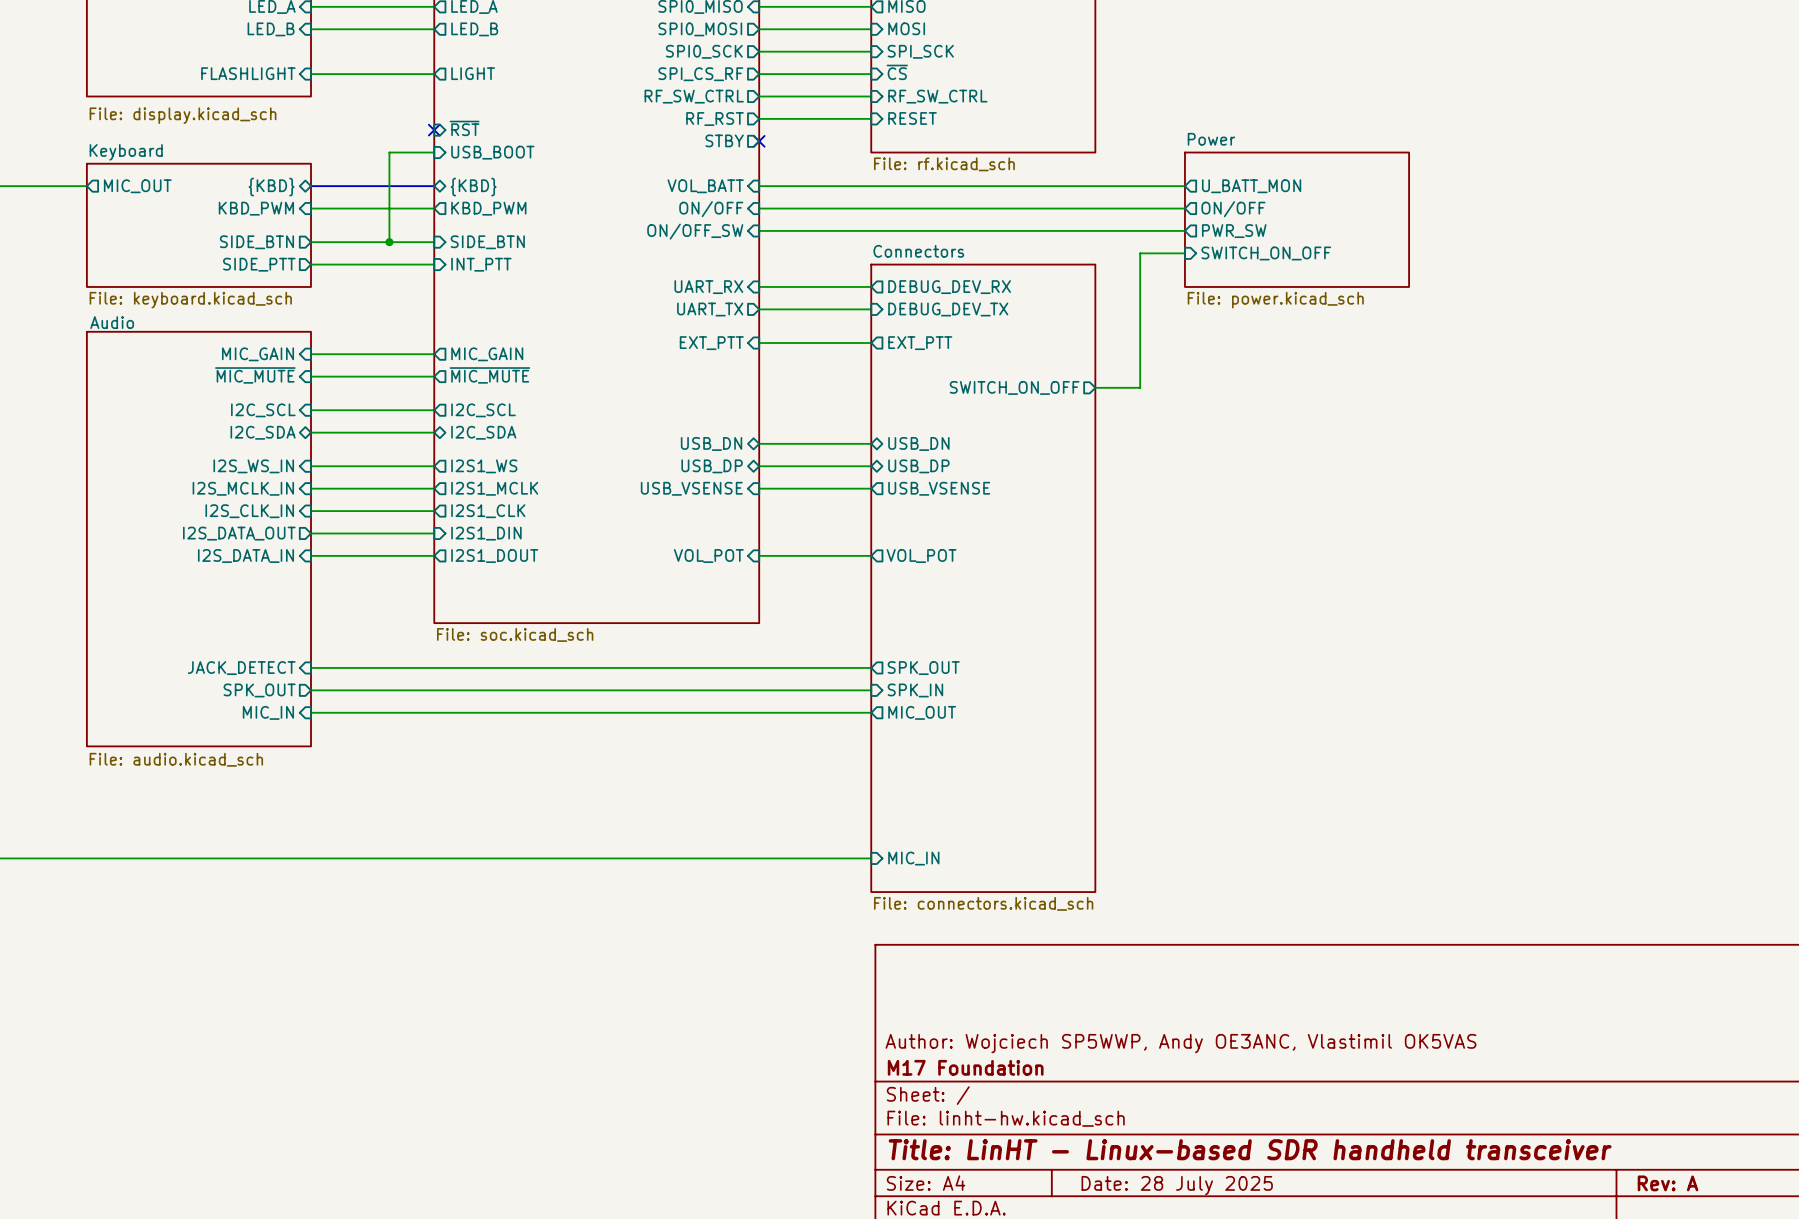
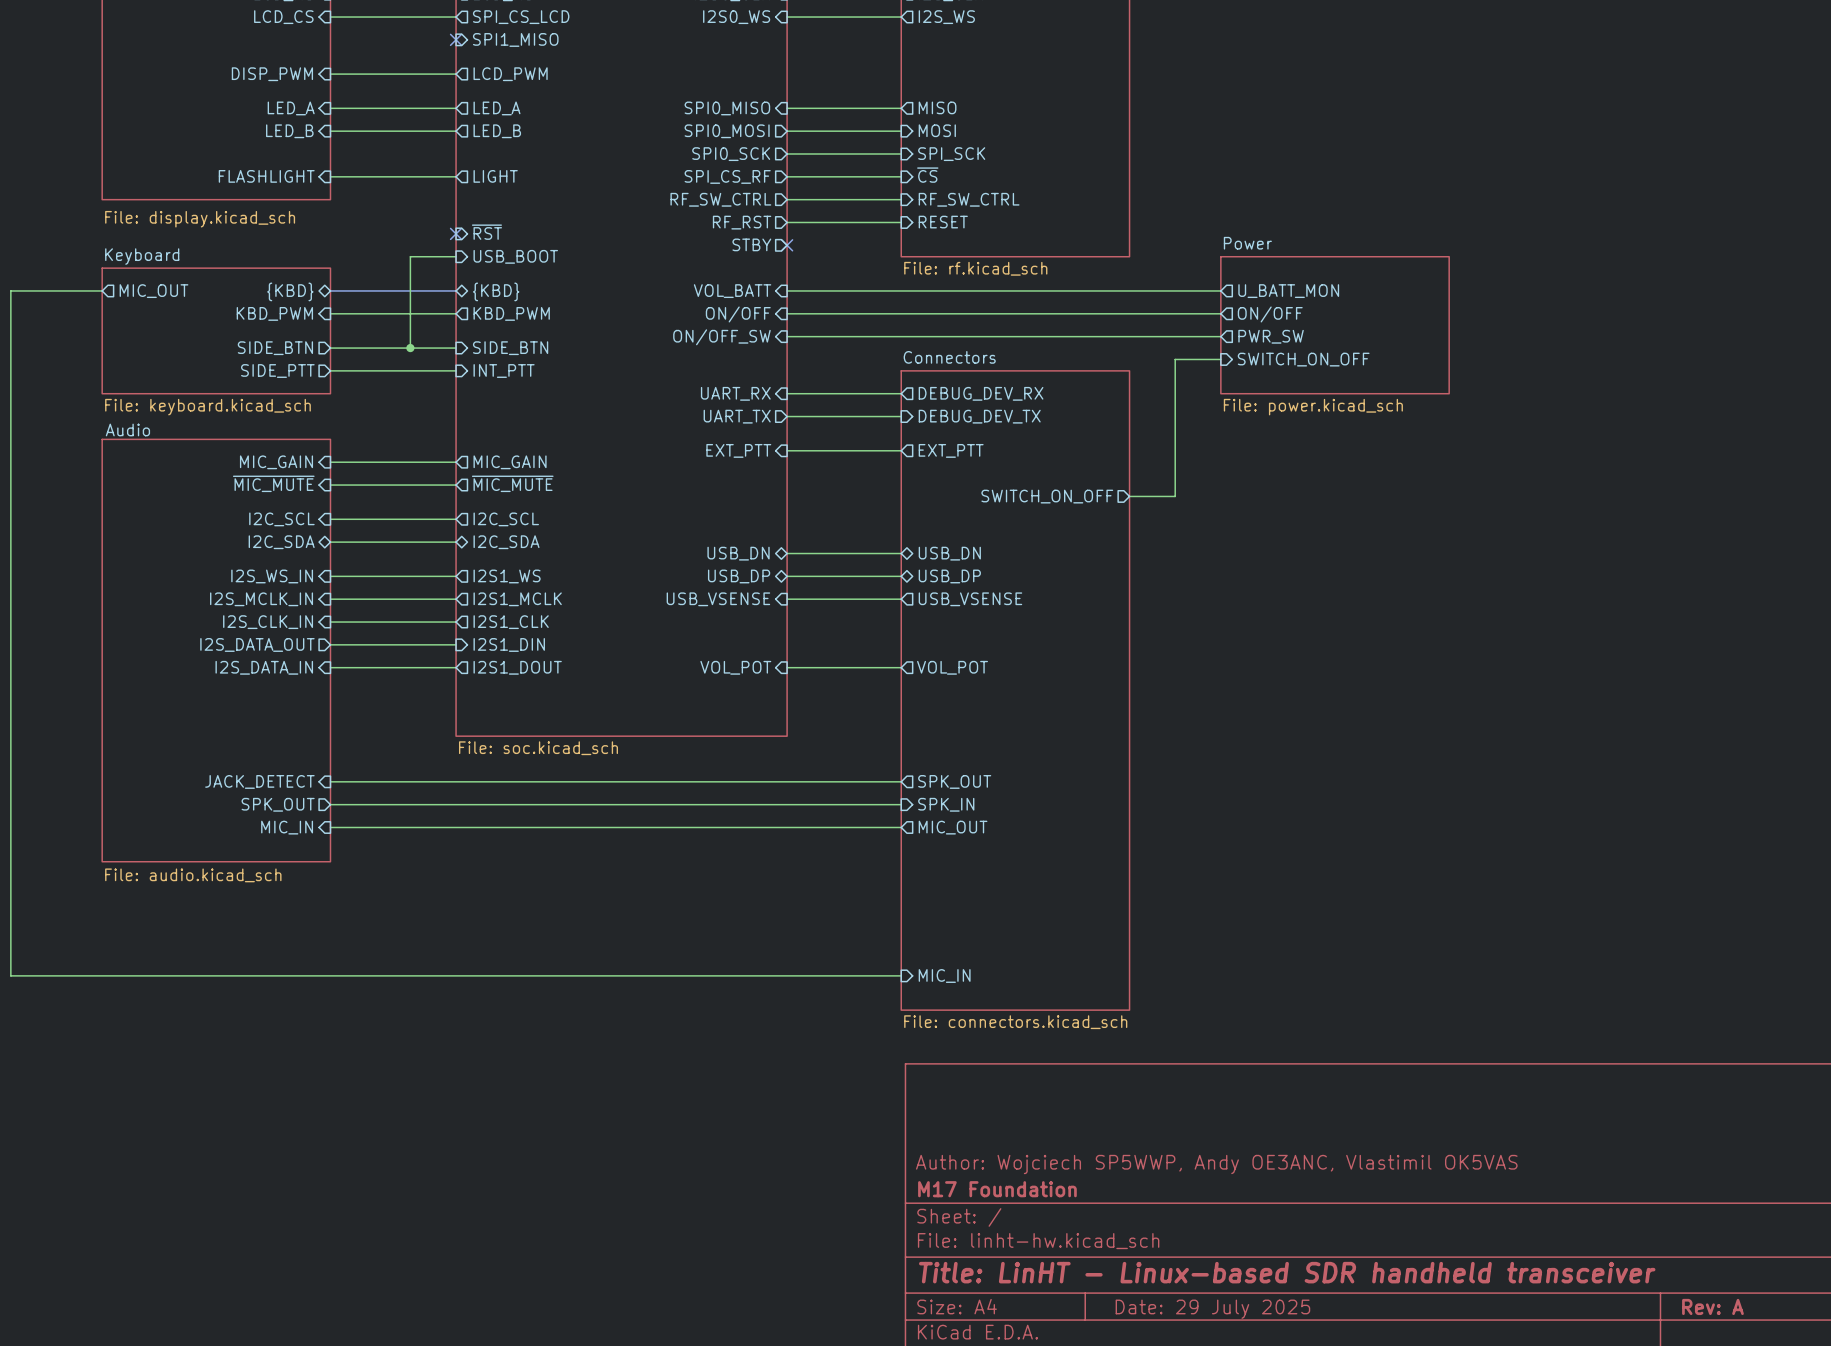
title block: Date: 28 July 2025 (1177, 1185) -> Date: 29 July 2025 (1212, 1309)

